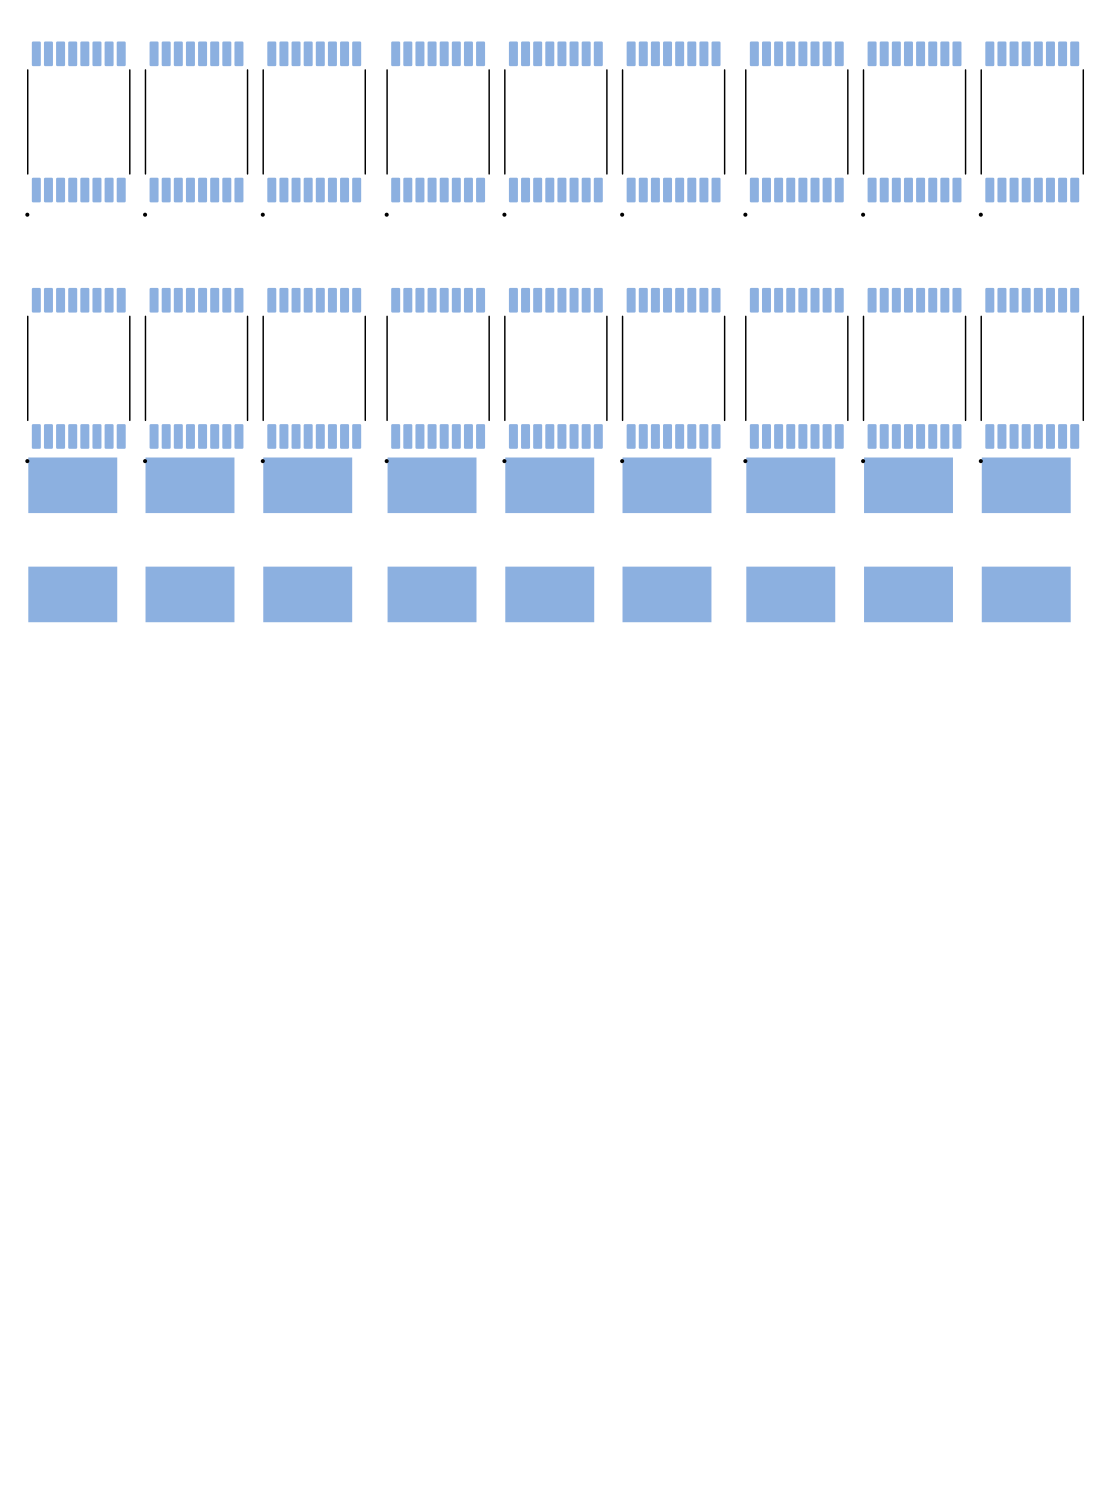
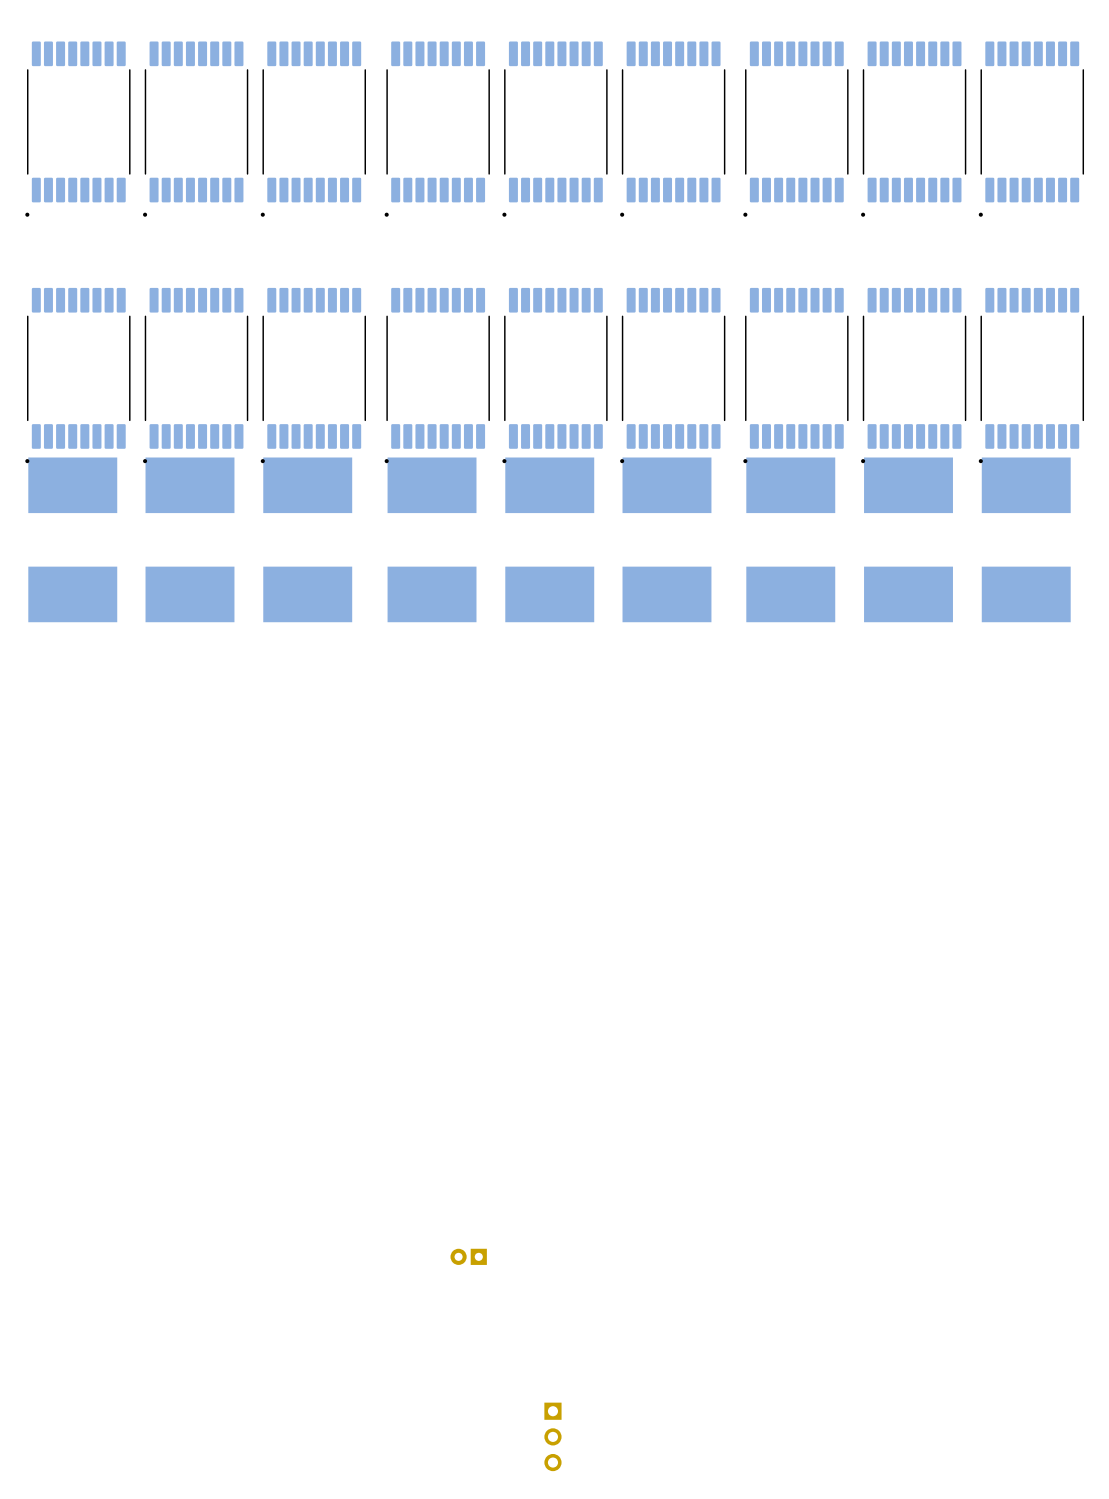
part: none -> (468, 1256)
part: none -> (552, 1436)

